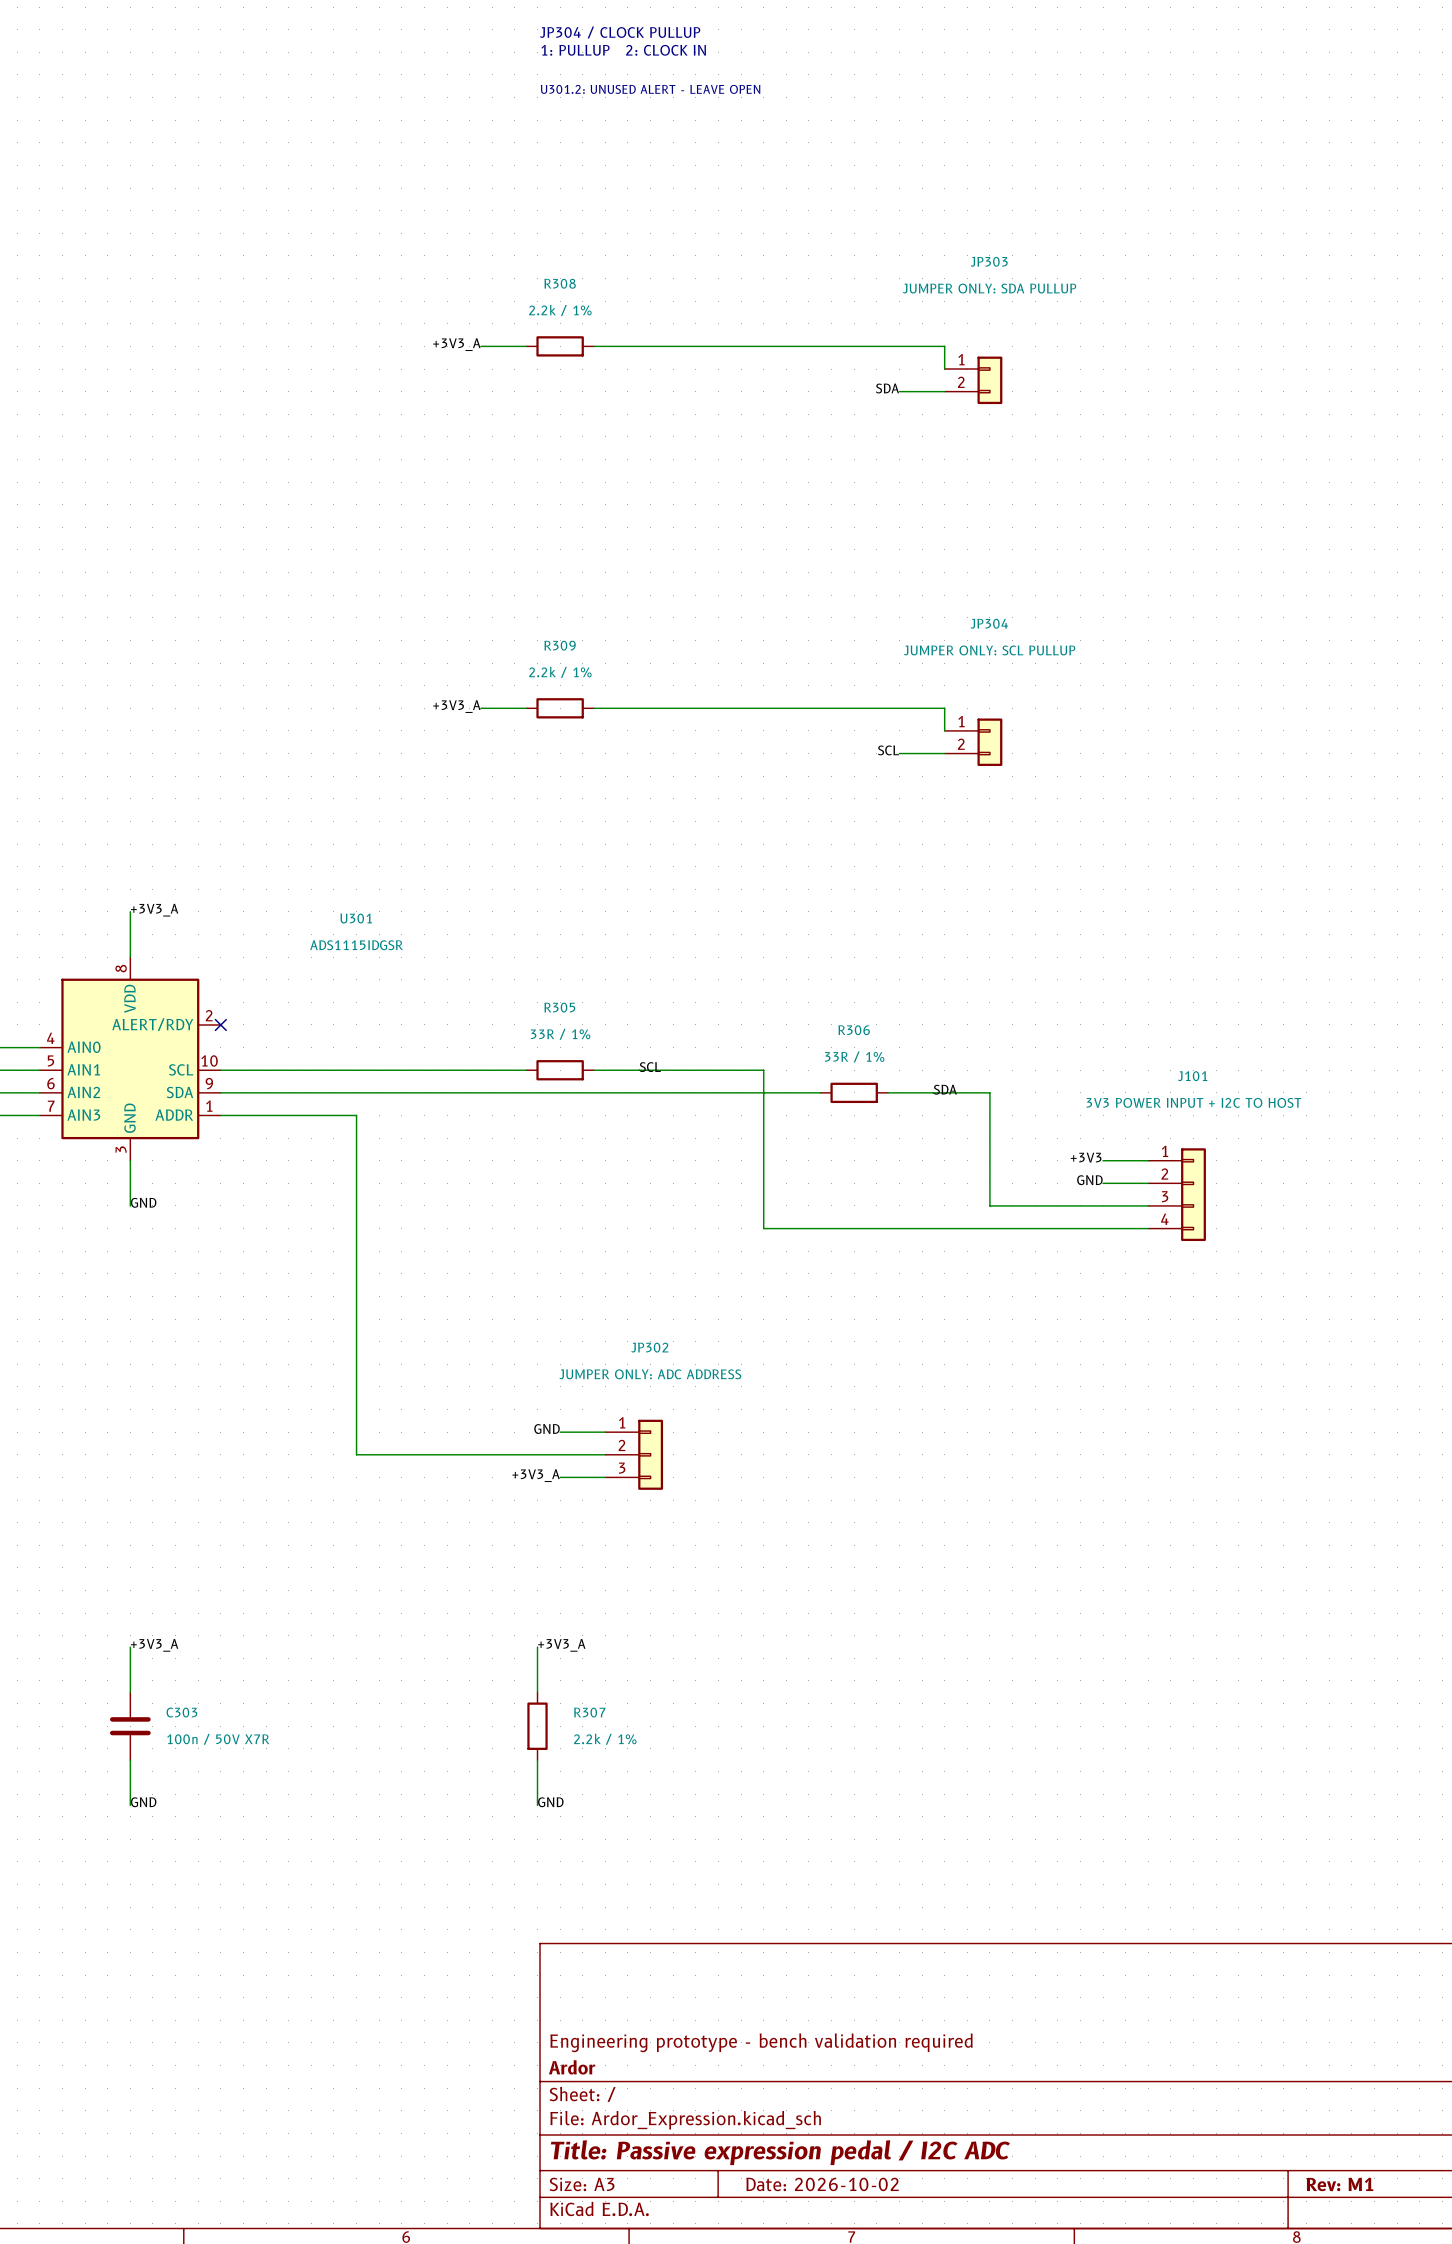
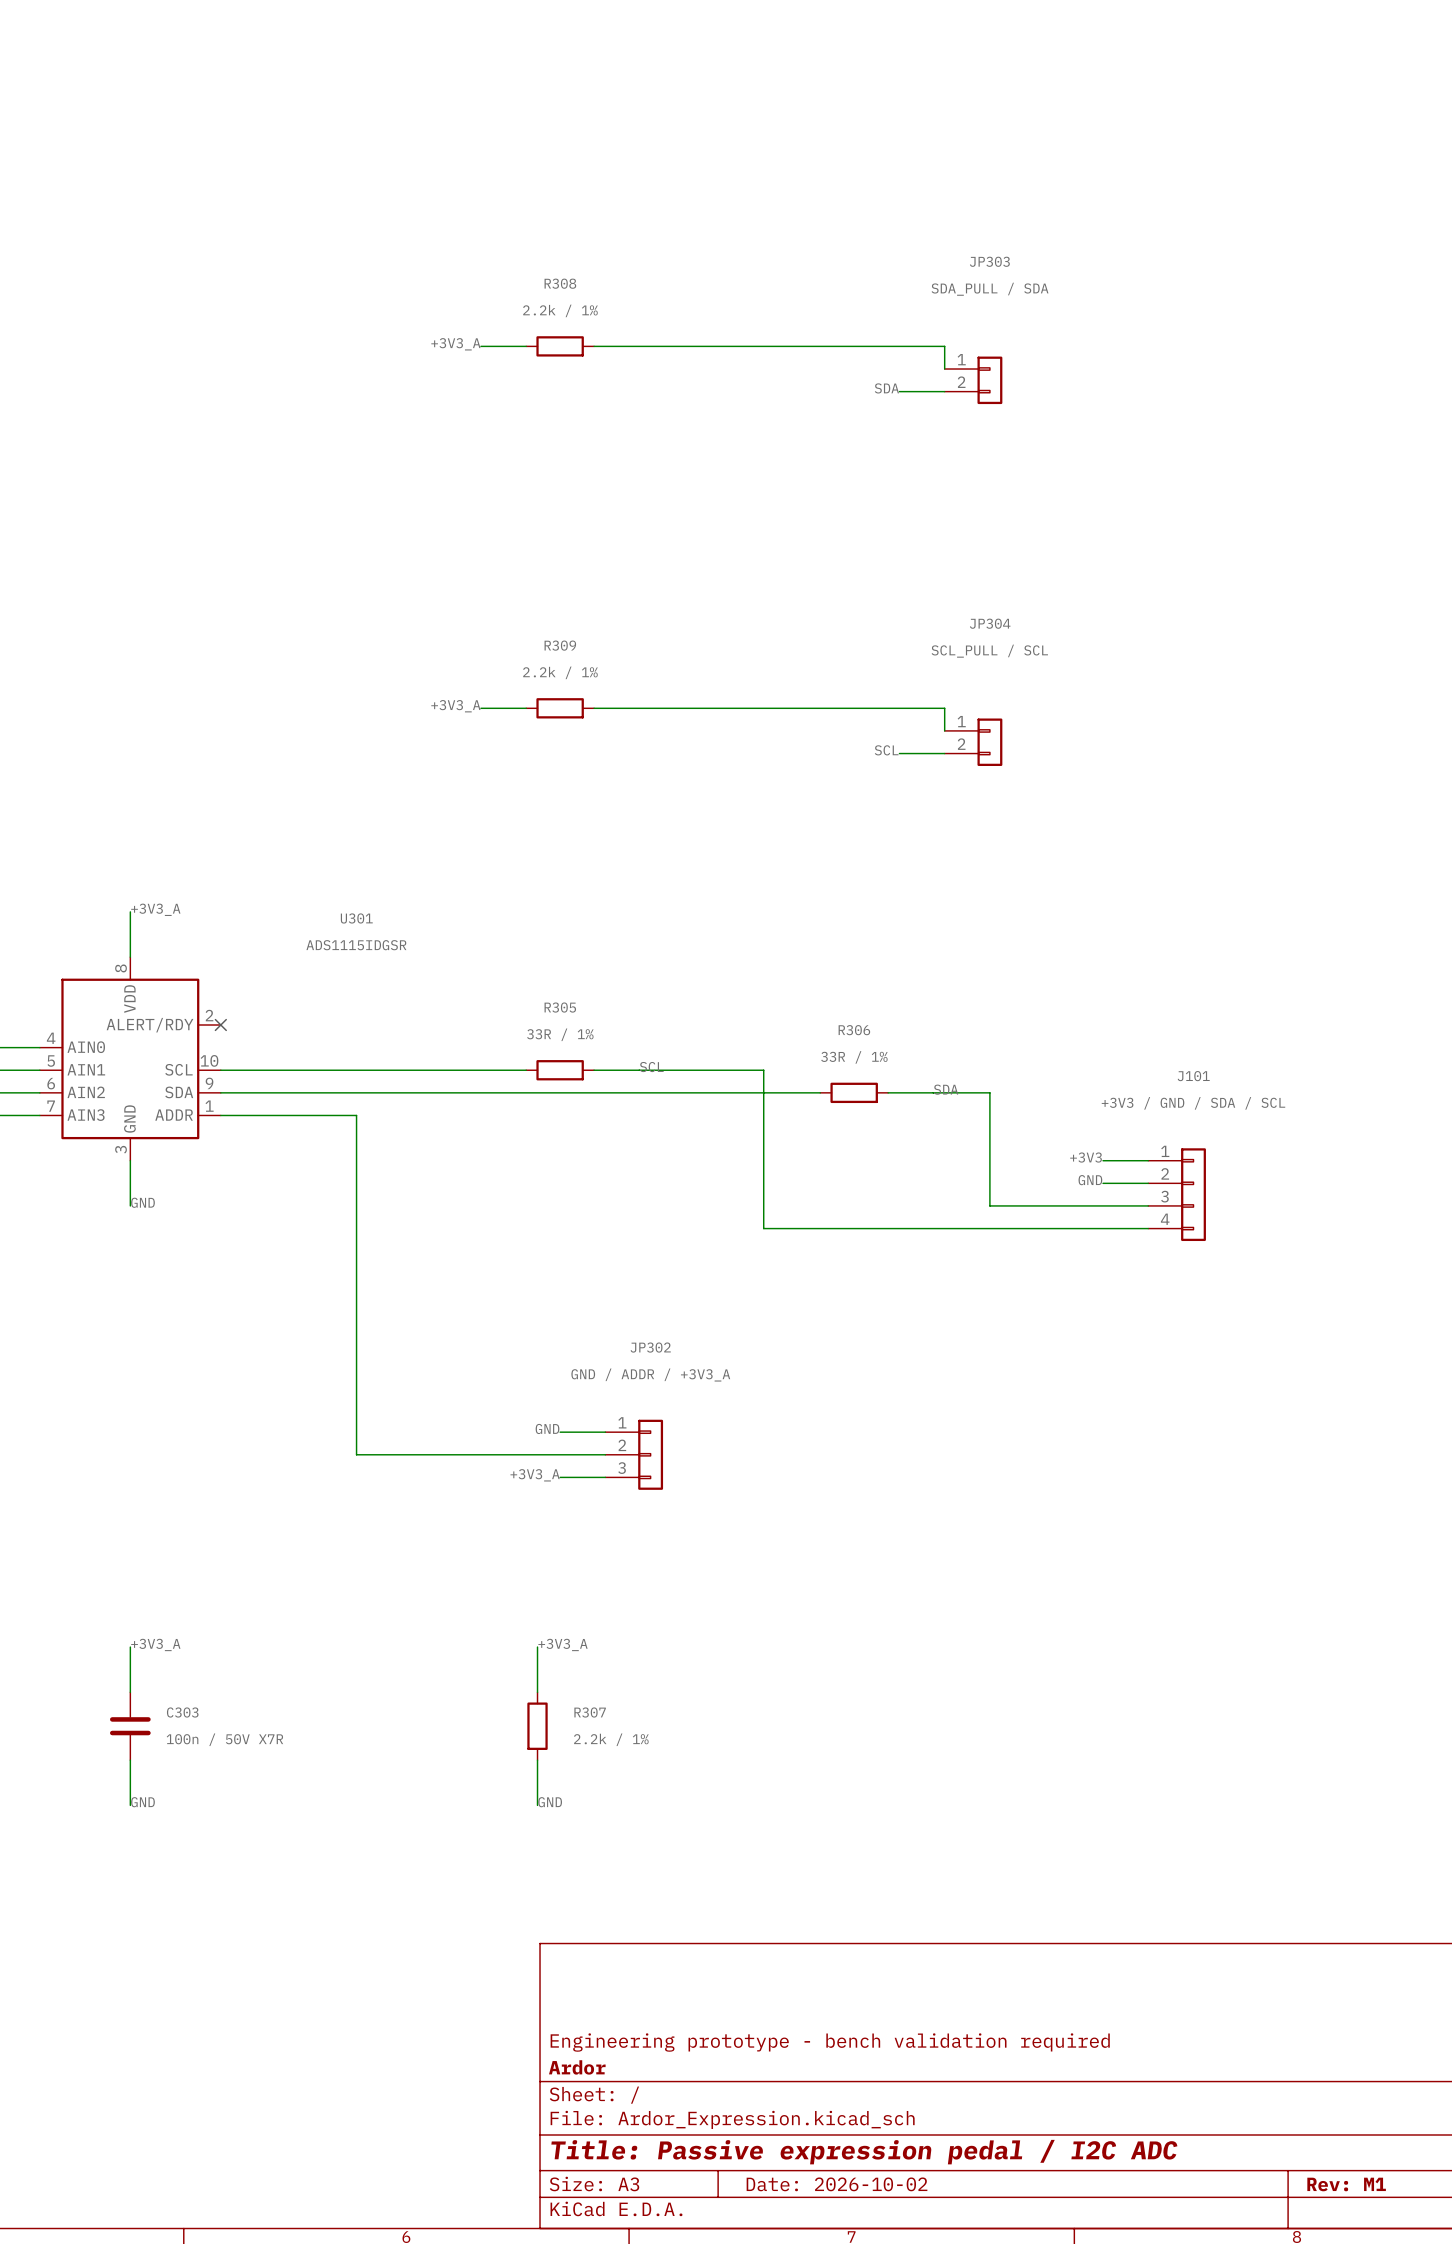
text: JP304 / CLOCK PULLUP (620, 32) -> none
text: 1: PULLUP 2: CLOCK IN (623, 50) -> none
text: U301.2: UNUSED ALERT - LEAVE OPEN (650, 89) -> none
JP303 value: JUMPER ONLY: SDA PULLUP (989, 288) -> SDA_PULL / SDA (990, 289)
JP304 value: JUMPER ONLY: SCL PULLUP (989, 650) -> SCL_PULL / SCL (989, 651)
J101 value: 3V3 POWER INPUT + I2C TO HOST (1193, 1102) -> +3V3 / GND / SDA / SCL (1193, 1103)
JP302 value: JUMPER ONLY: ADC ADDRESS (650, 1374) -> GND / ADDR / +3V3_A (650, 1375)

